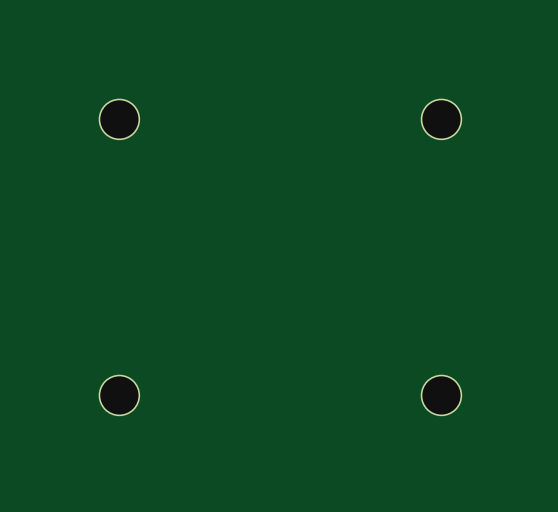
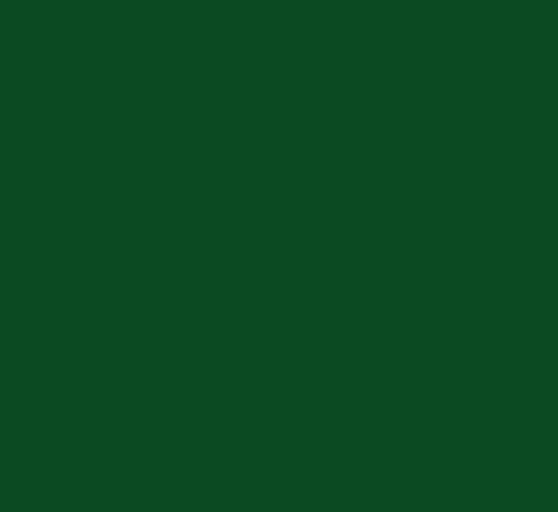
part: (119, 119) -> none
part: (441, 119) -> none
part: (119, 395) -> none
part: (441, 395) -> none

